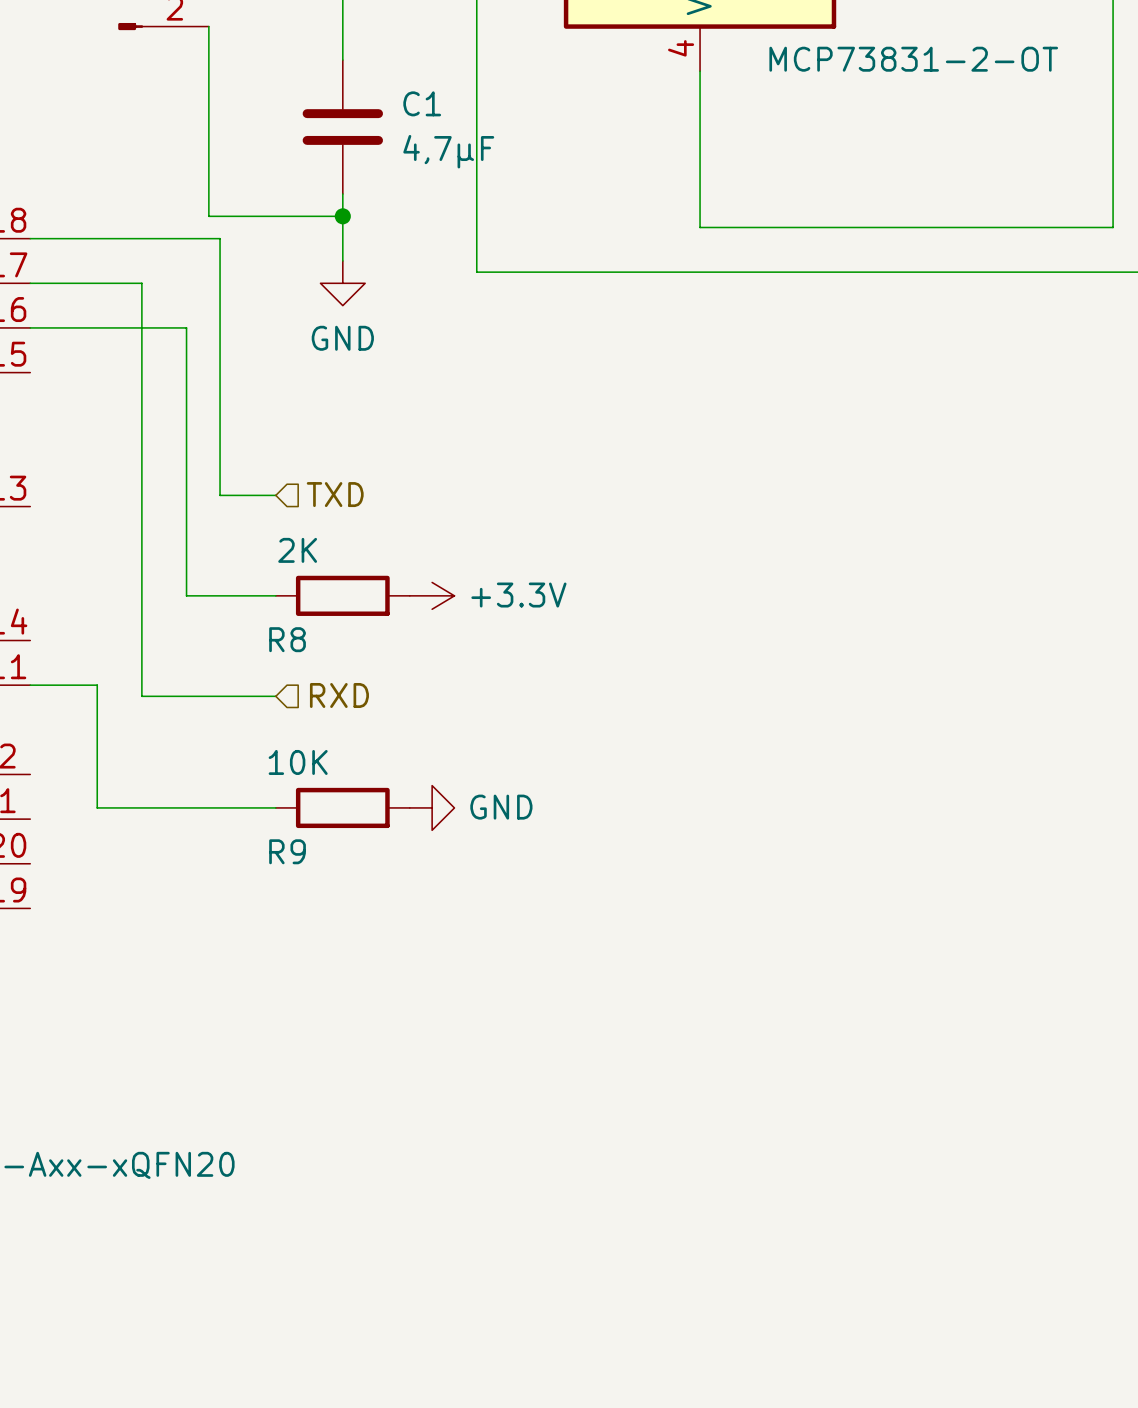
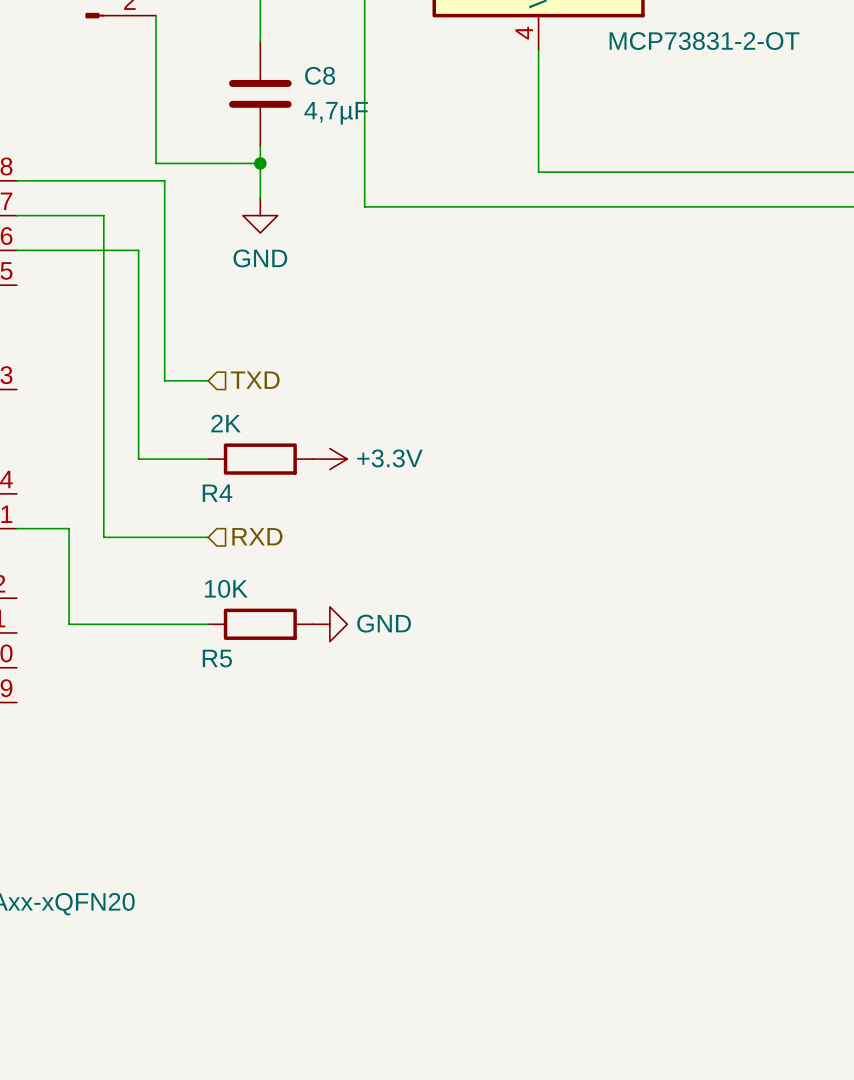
C1 name: C1 (422, 103) -> C8 (320, 75)
R8 name: R8 (287, 639) -> R4 (217, 493)
R9 name: R9 (287, 851) -> R5 (217, 658)

